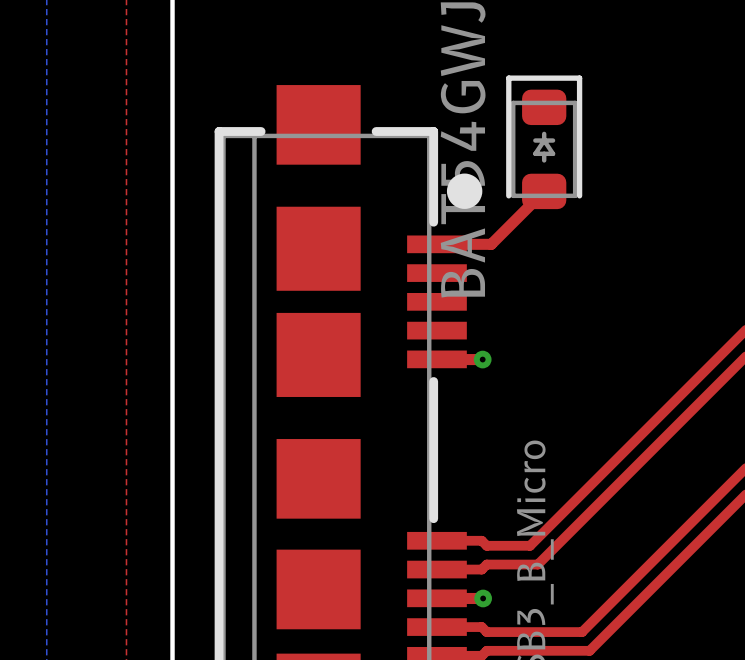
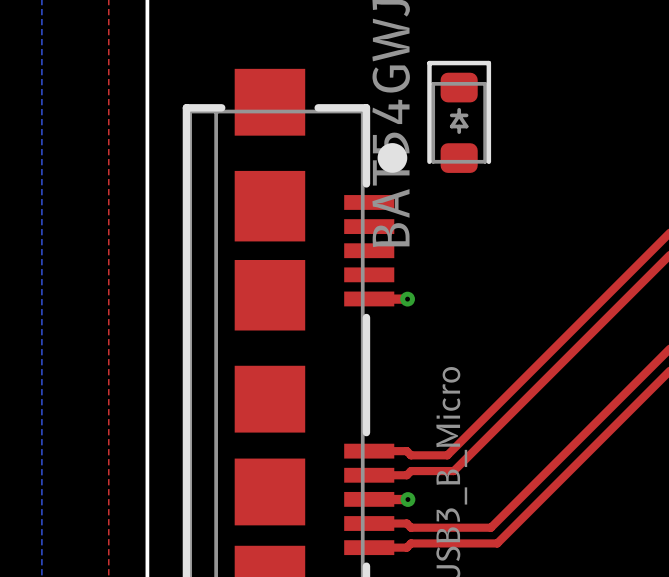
top track: (544, 191) (491, 244) (436, 244) -> none

